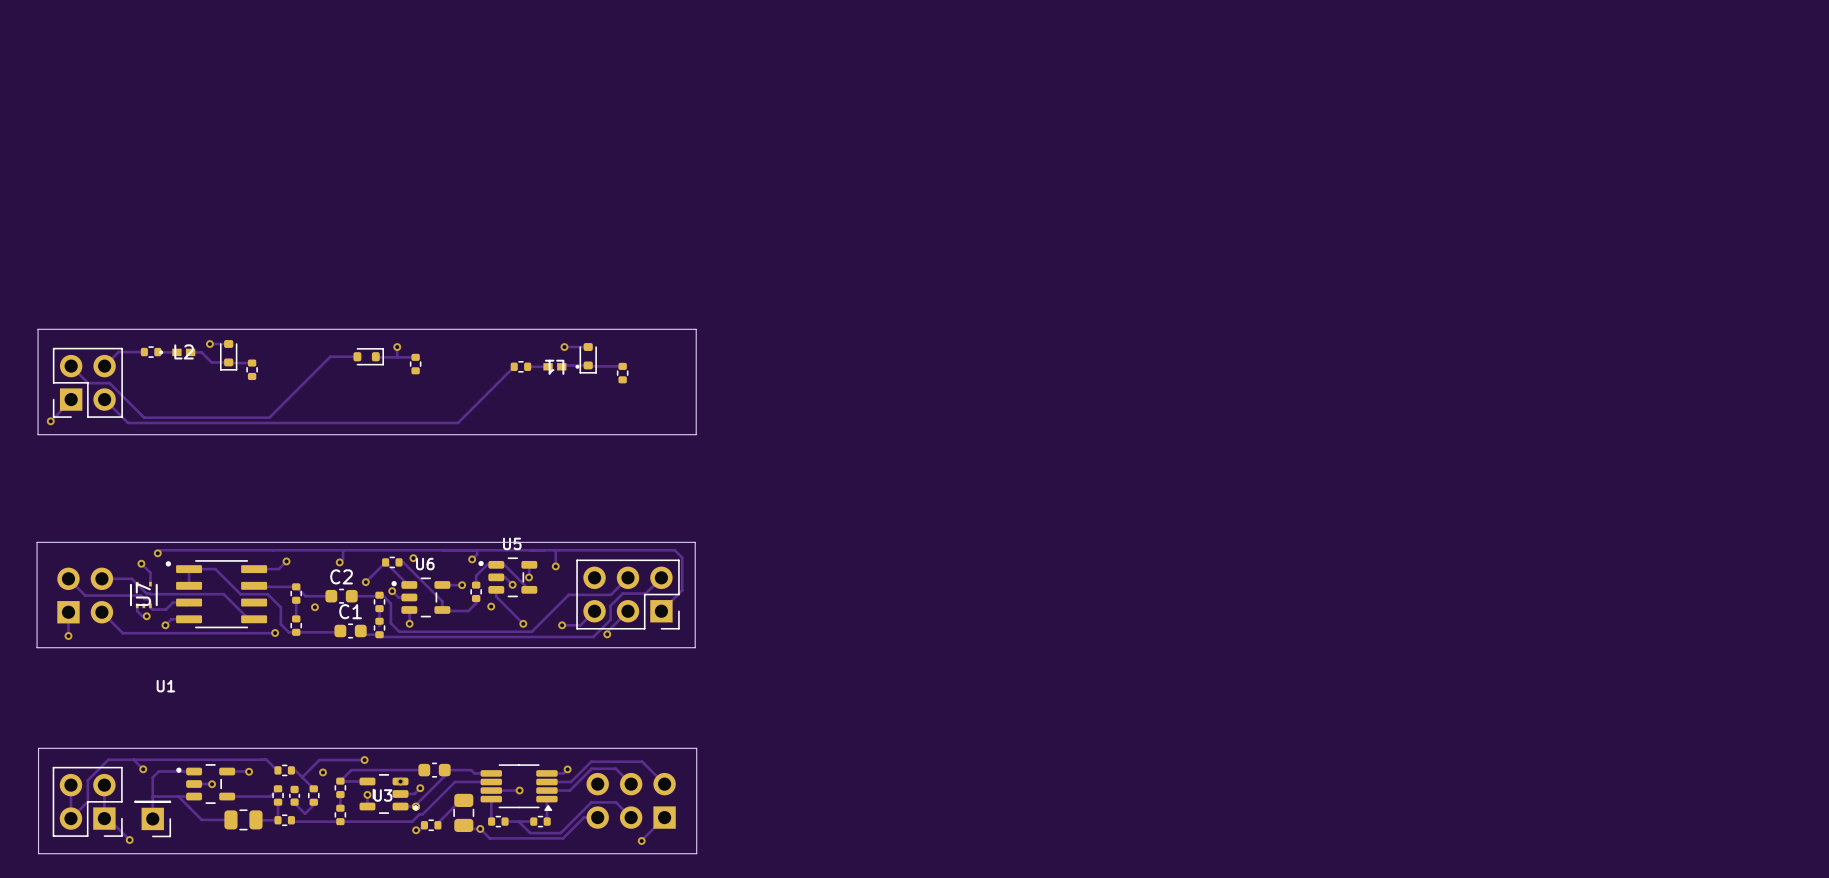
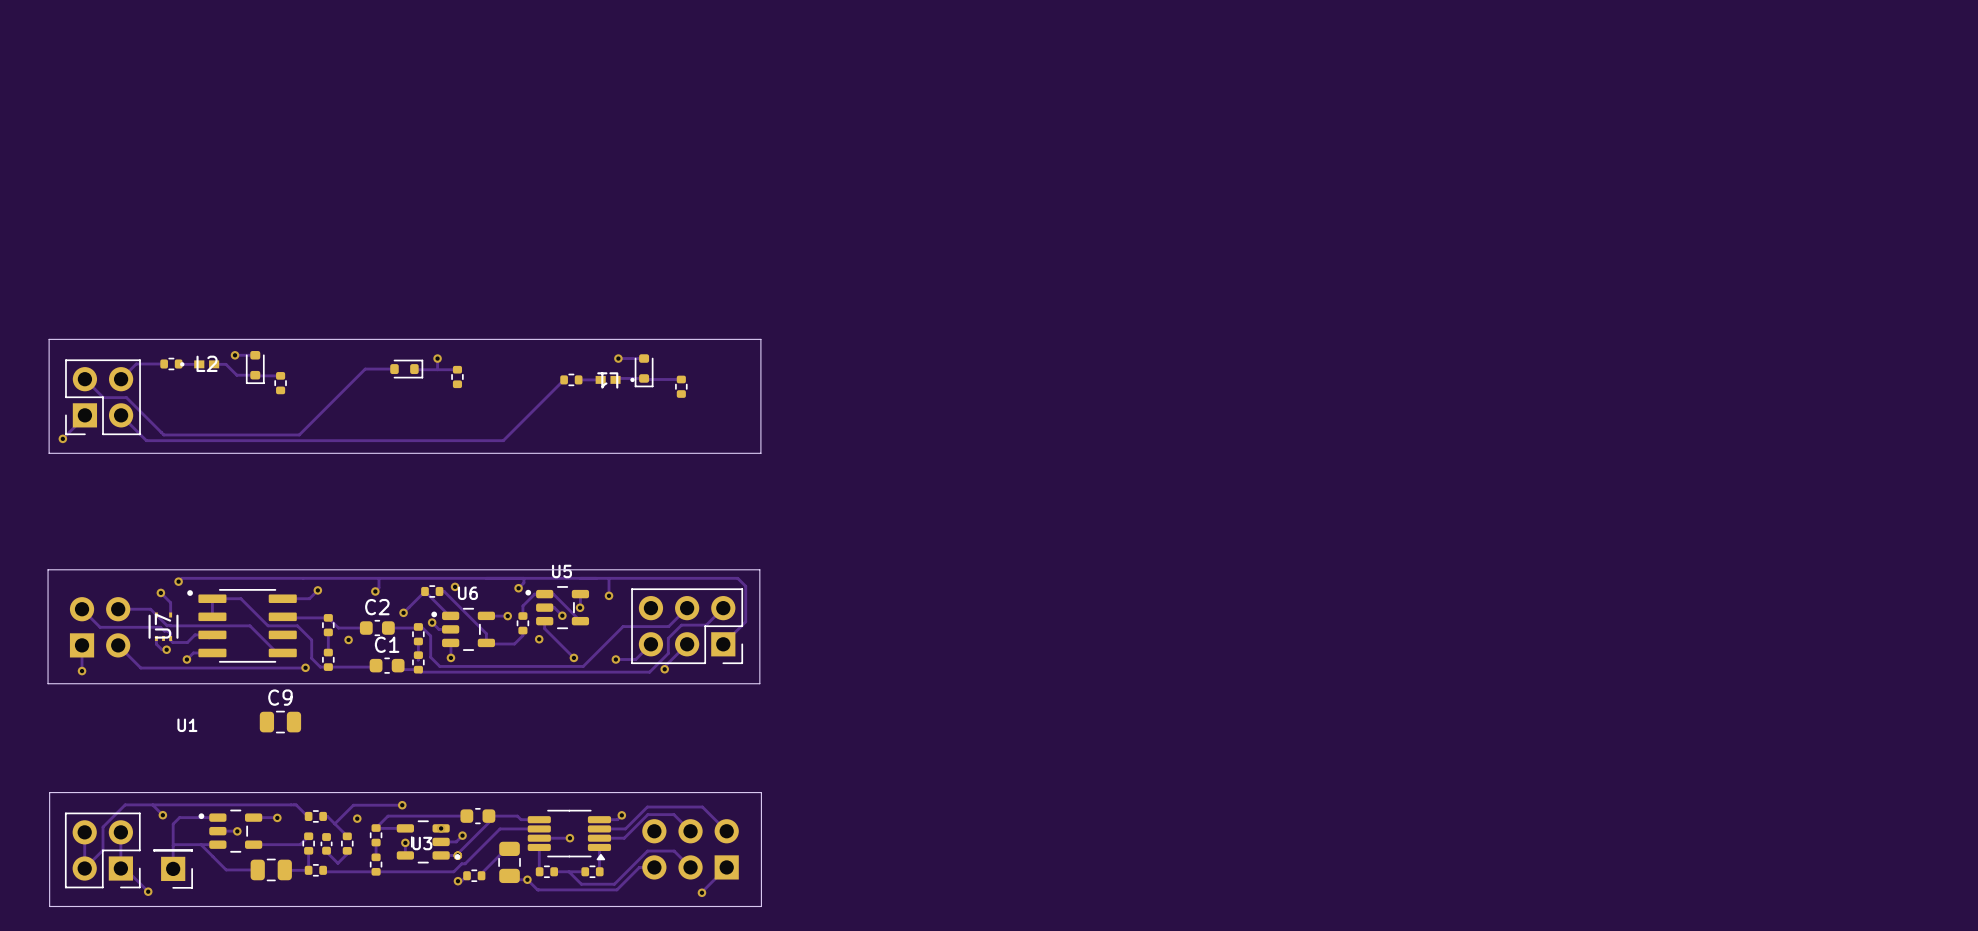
C9: none -> (280, 722)

